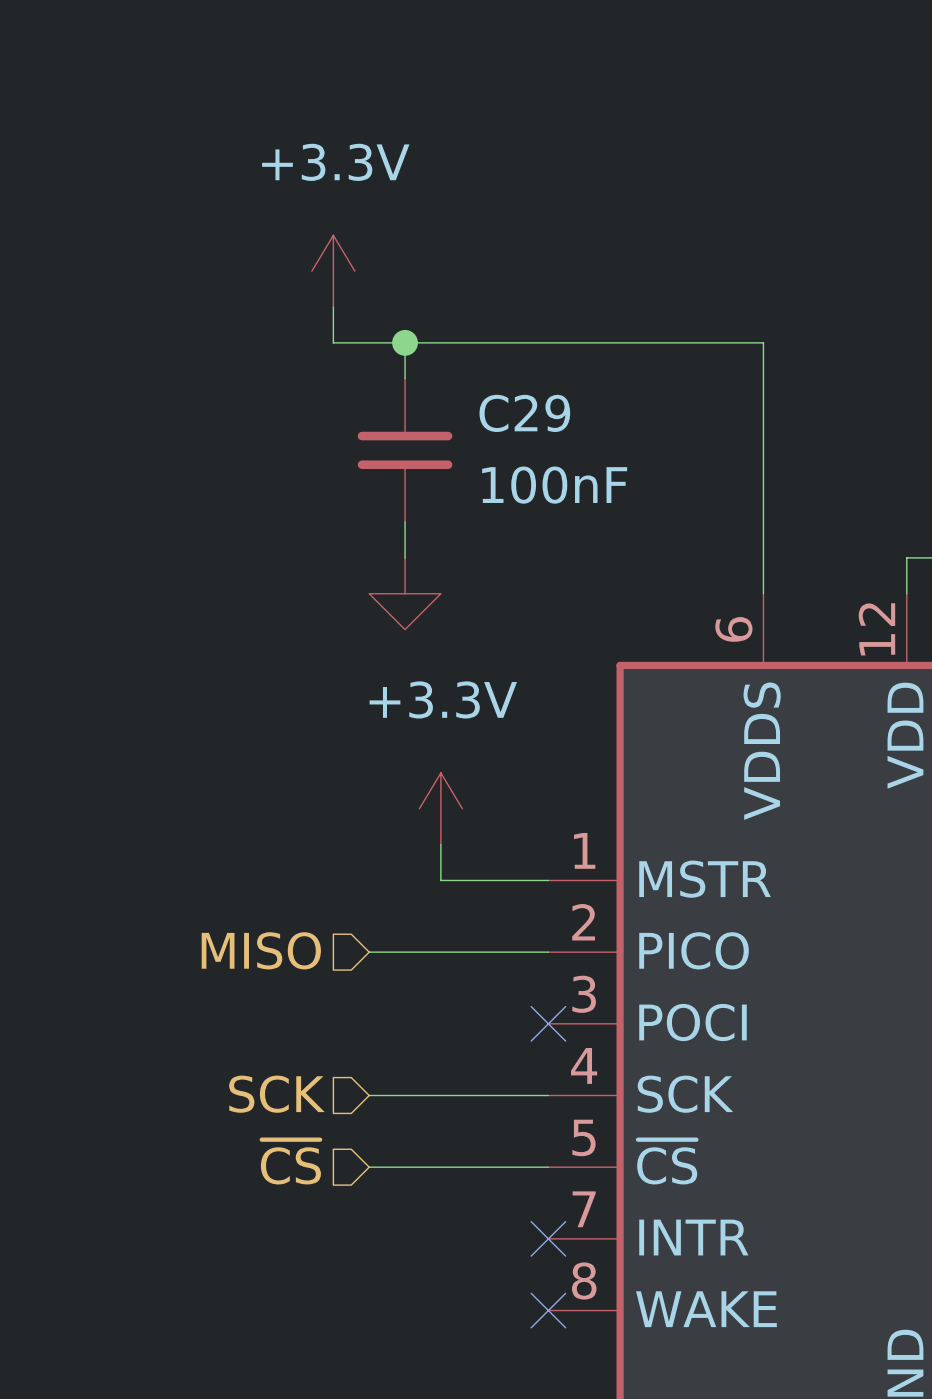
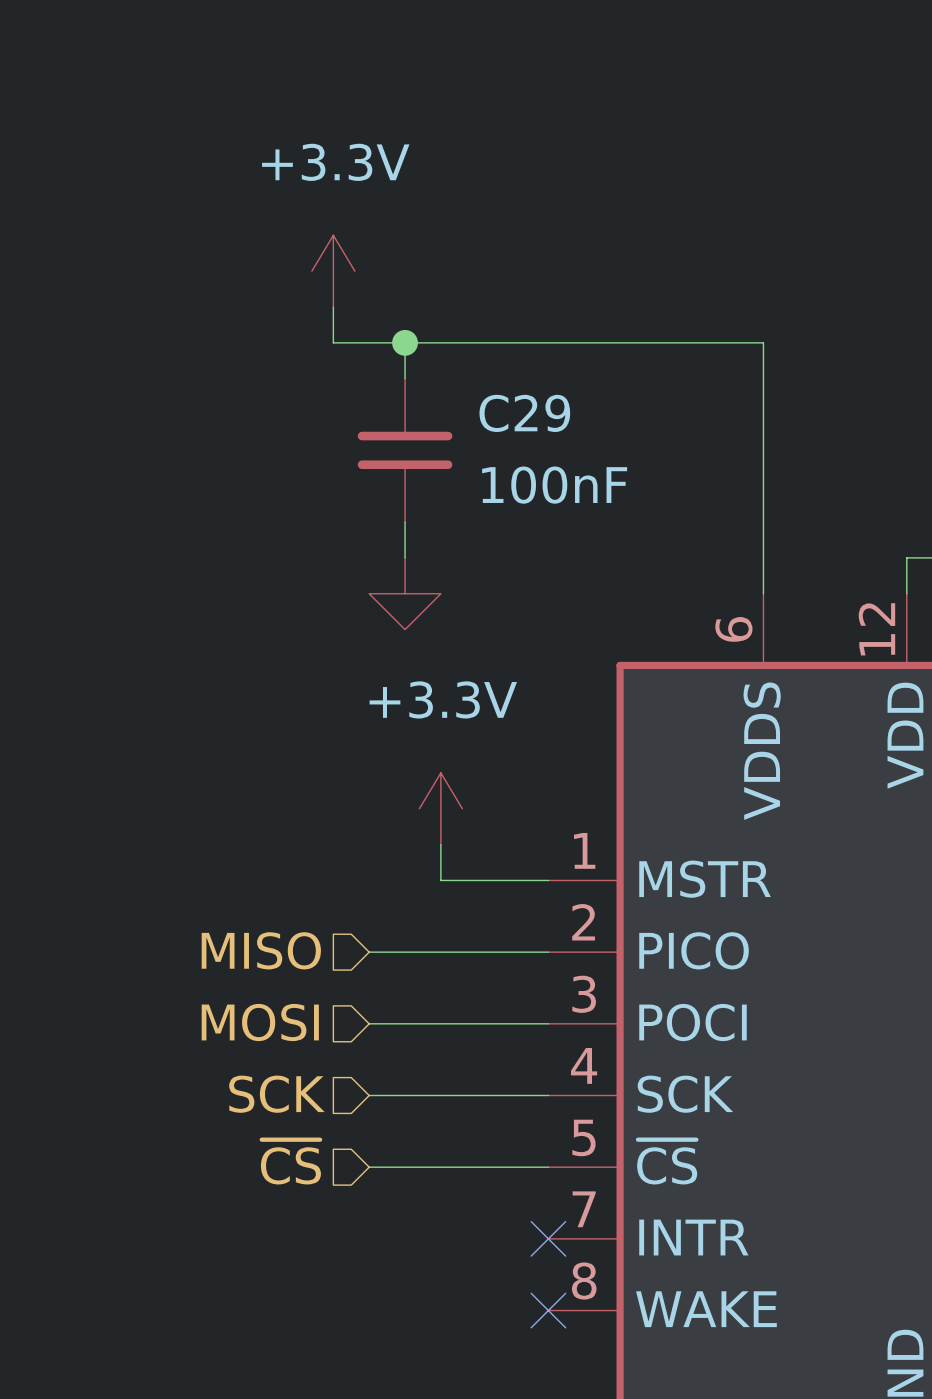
hierarchical label: none -> MOSI (260, 1022)
wire: none -> (369, 1023) (548, 1023)
no-connect mark: (548, 1023) -> none

